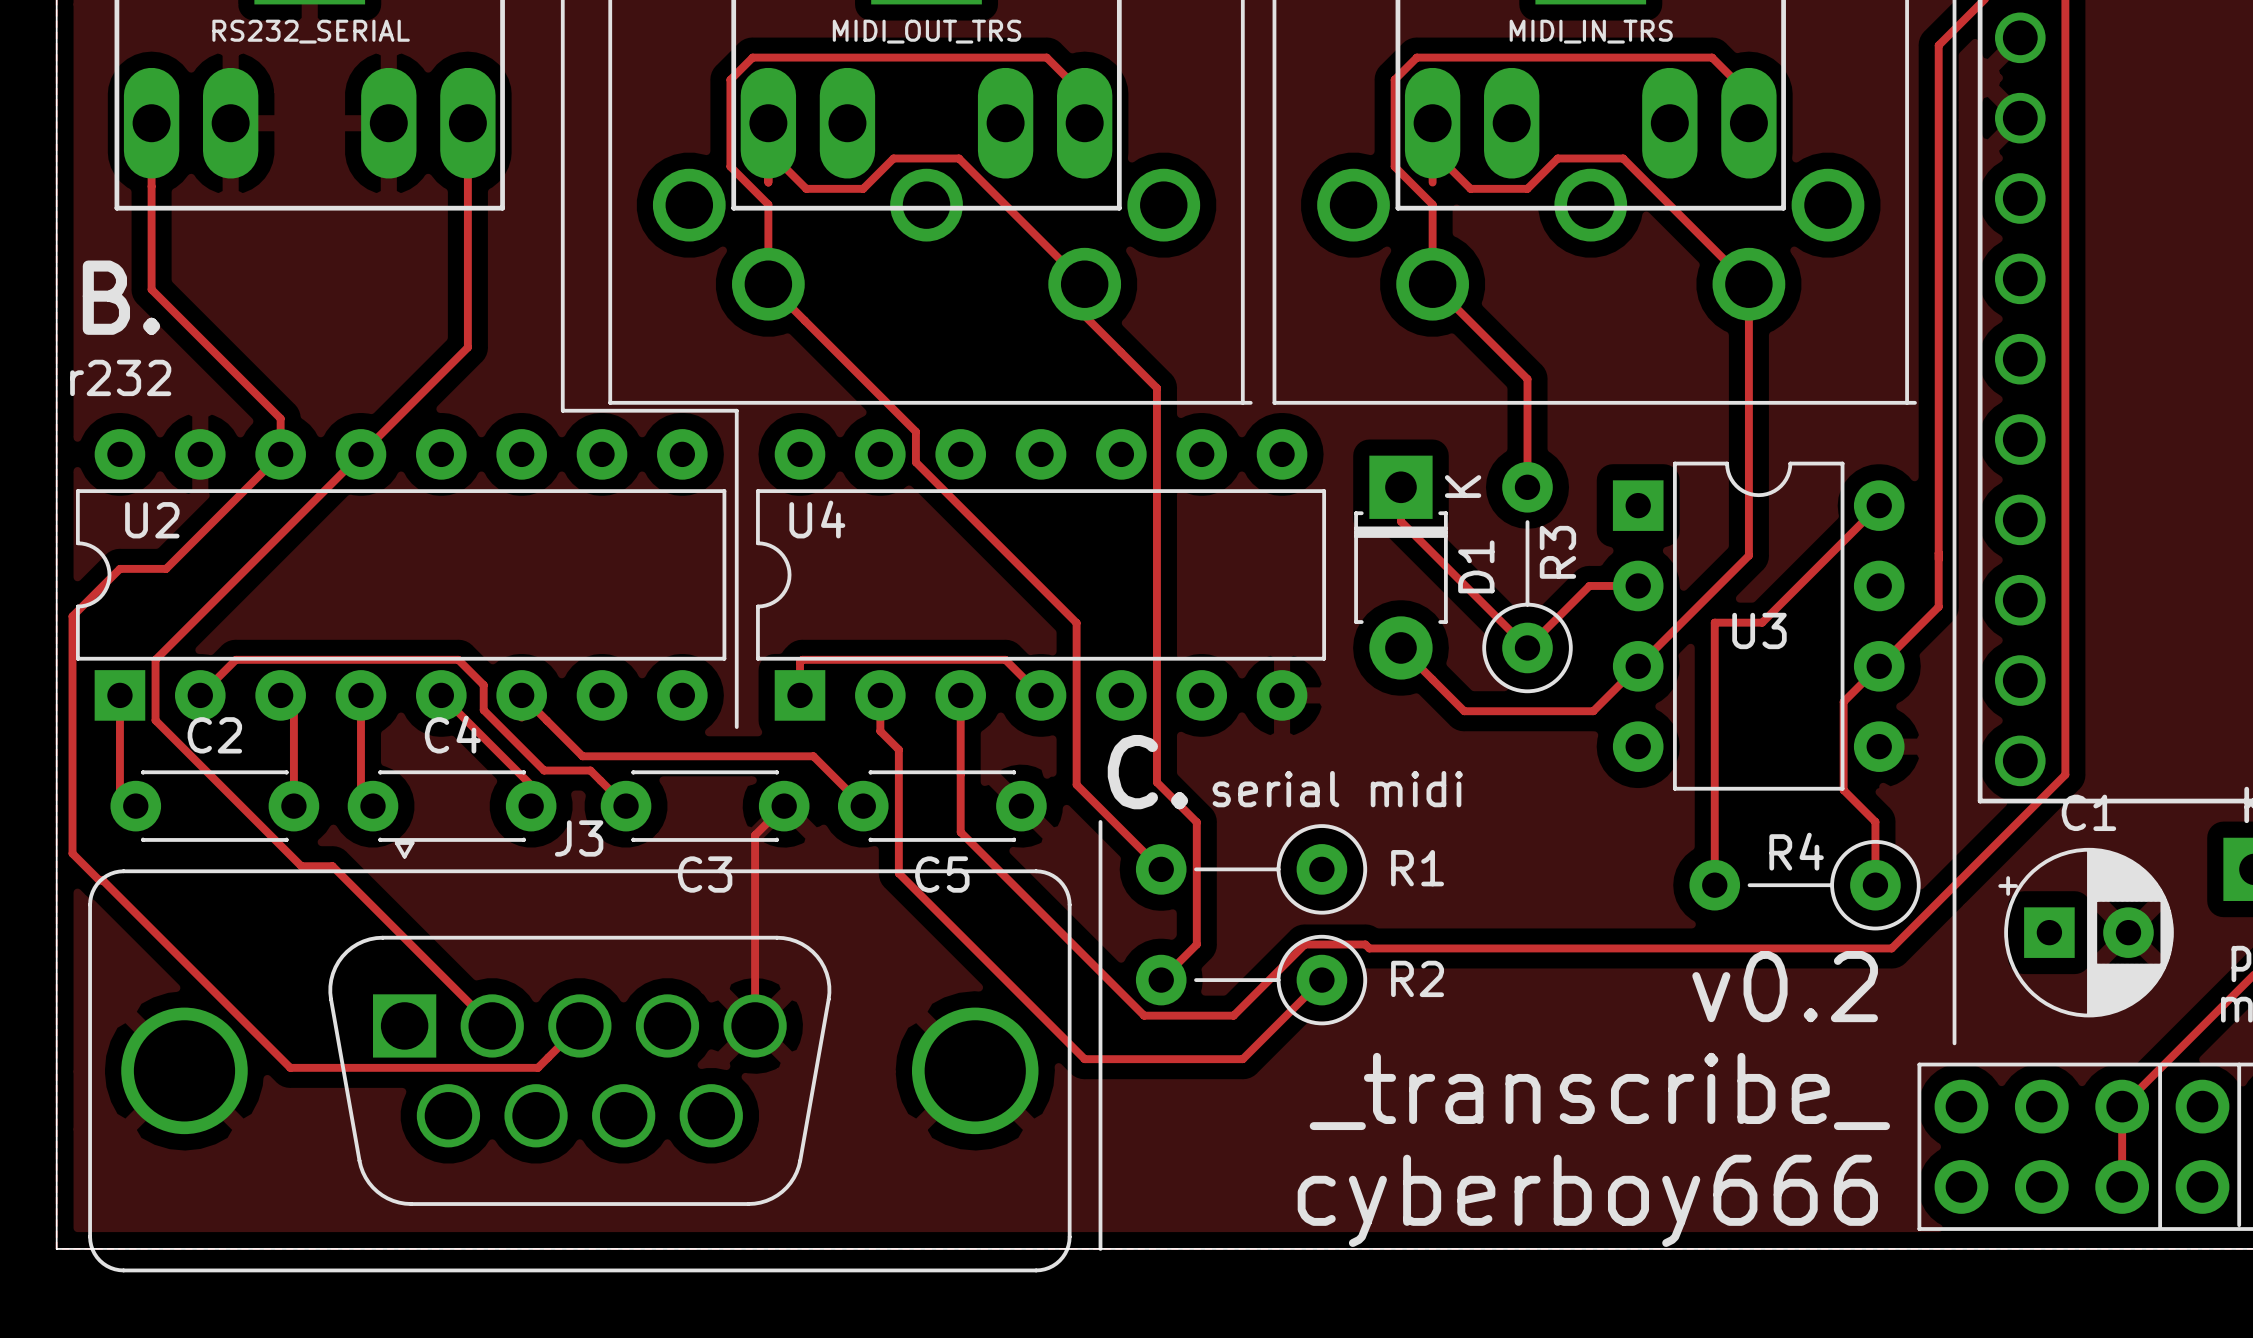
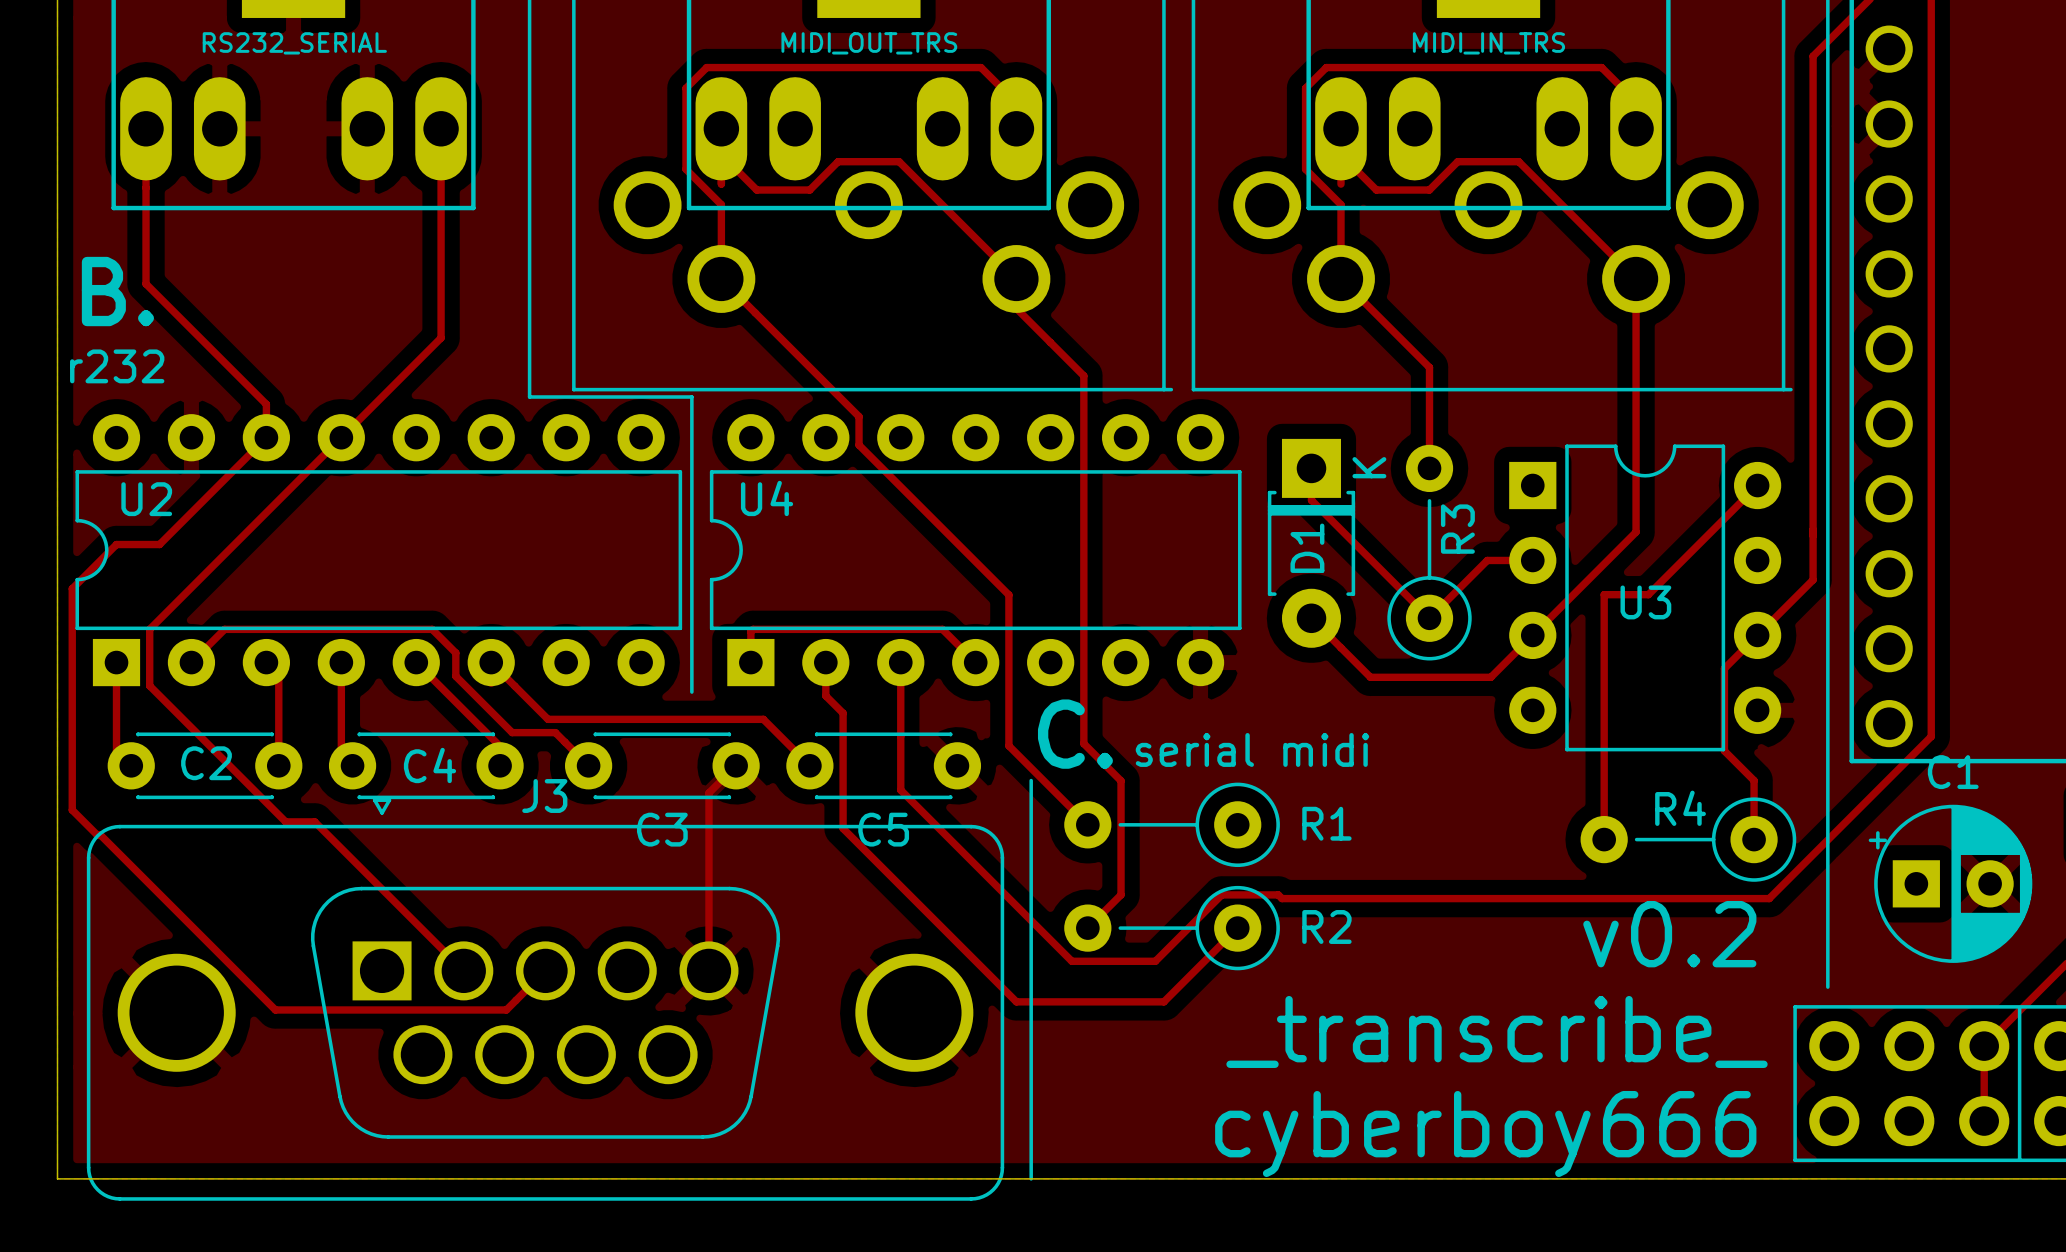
D1 name position: D1 (1476, 566) -> D1 (1307, 548)
C4 name position: C4 (452, 734) -> C4 (429, 765)
C2 name position: C2 (214, 735) -> C2 (206, 763)

